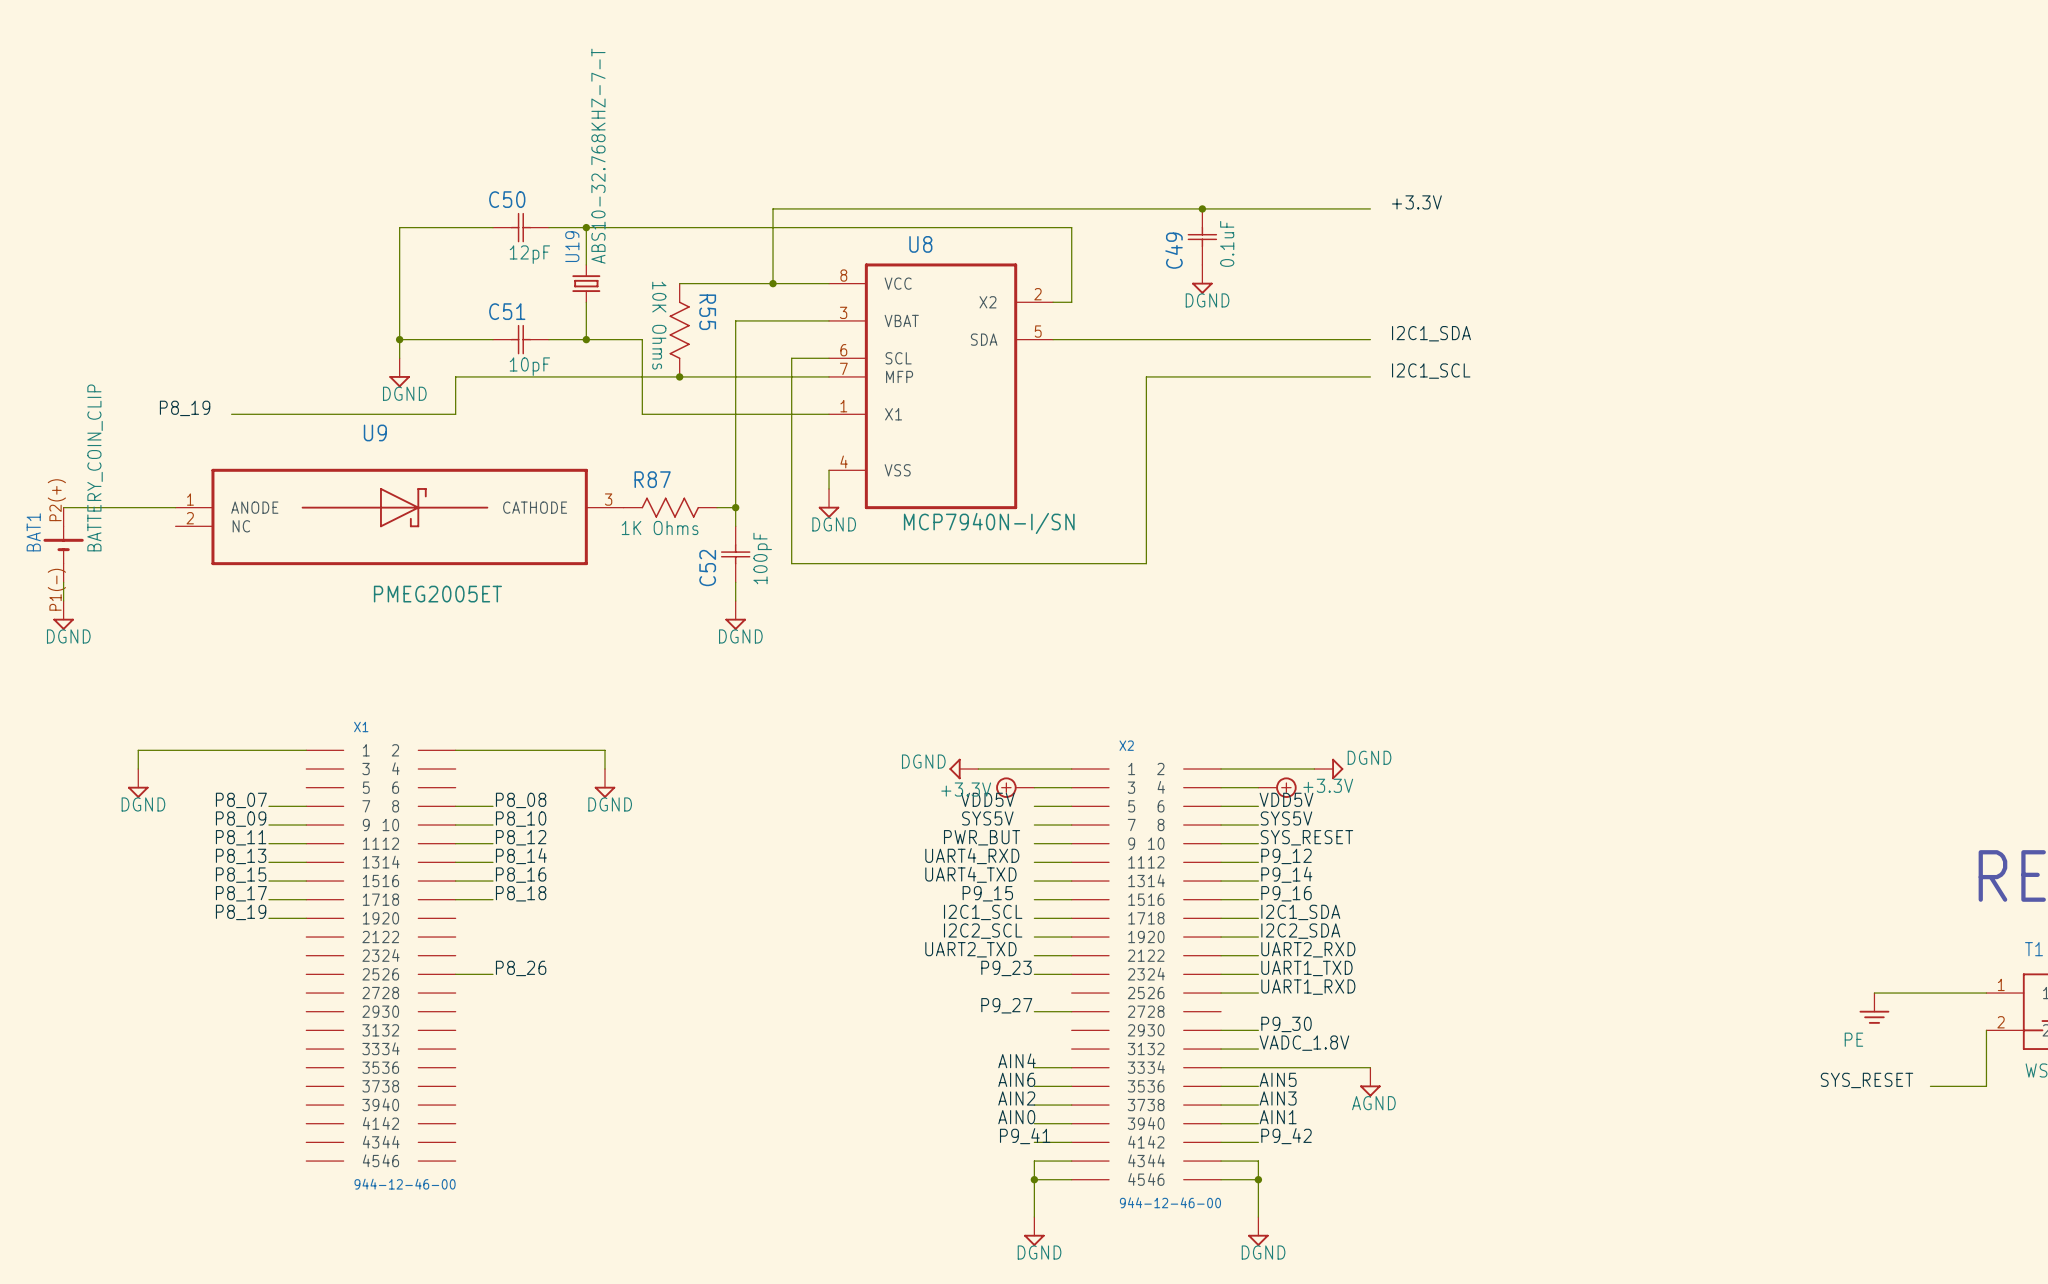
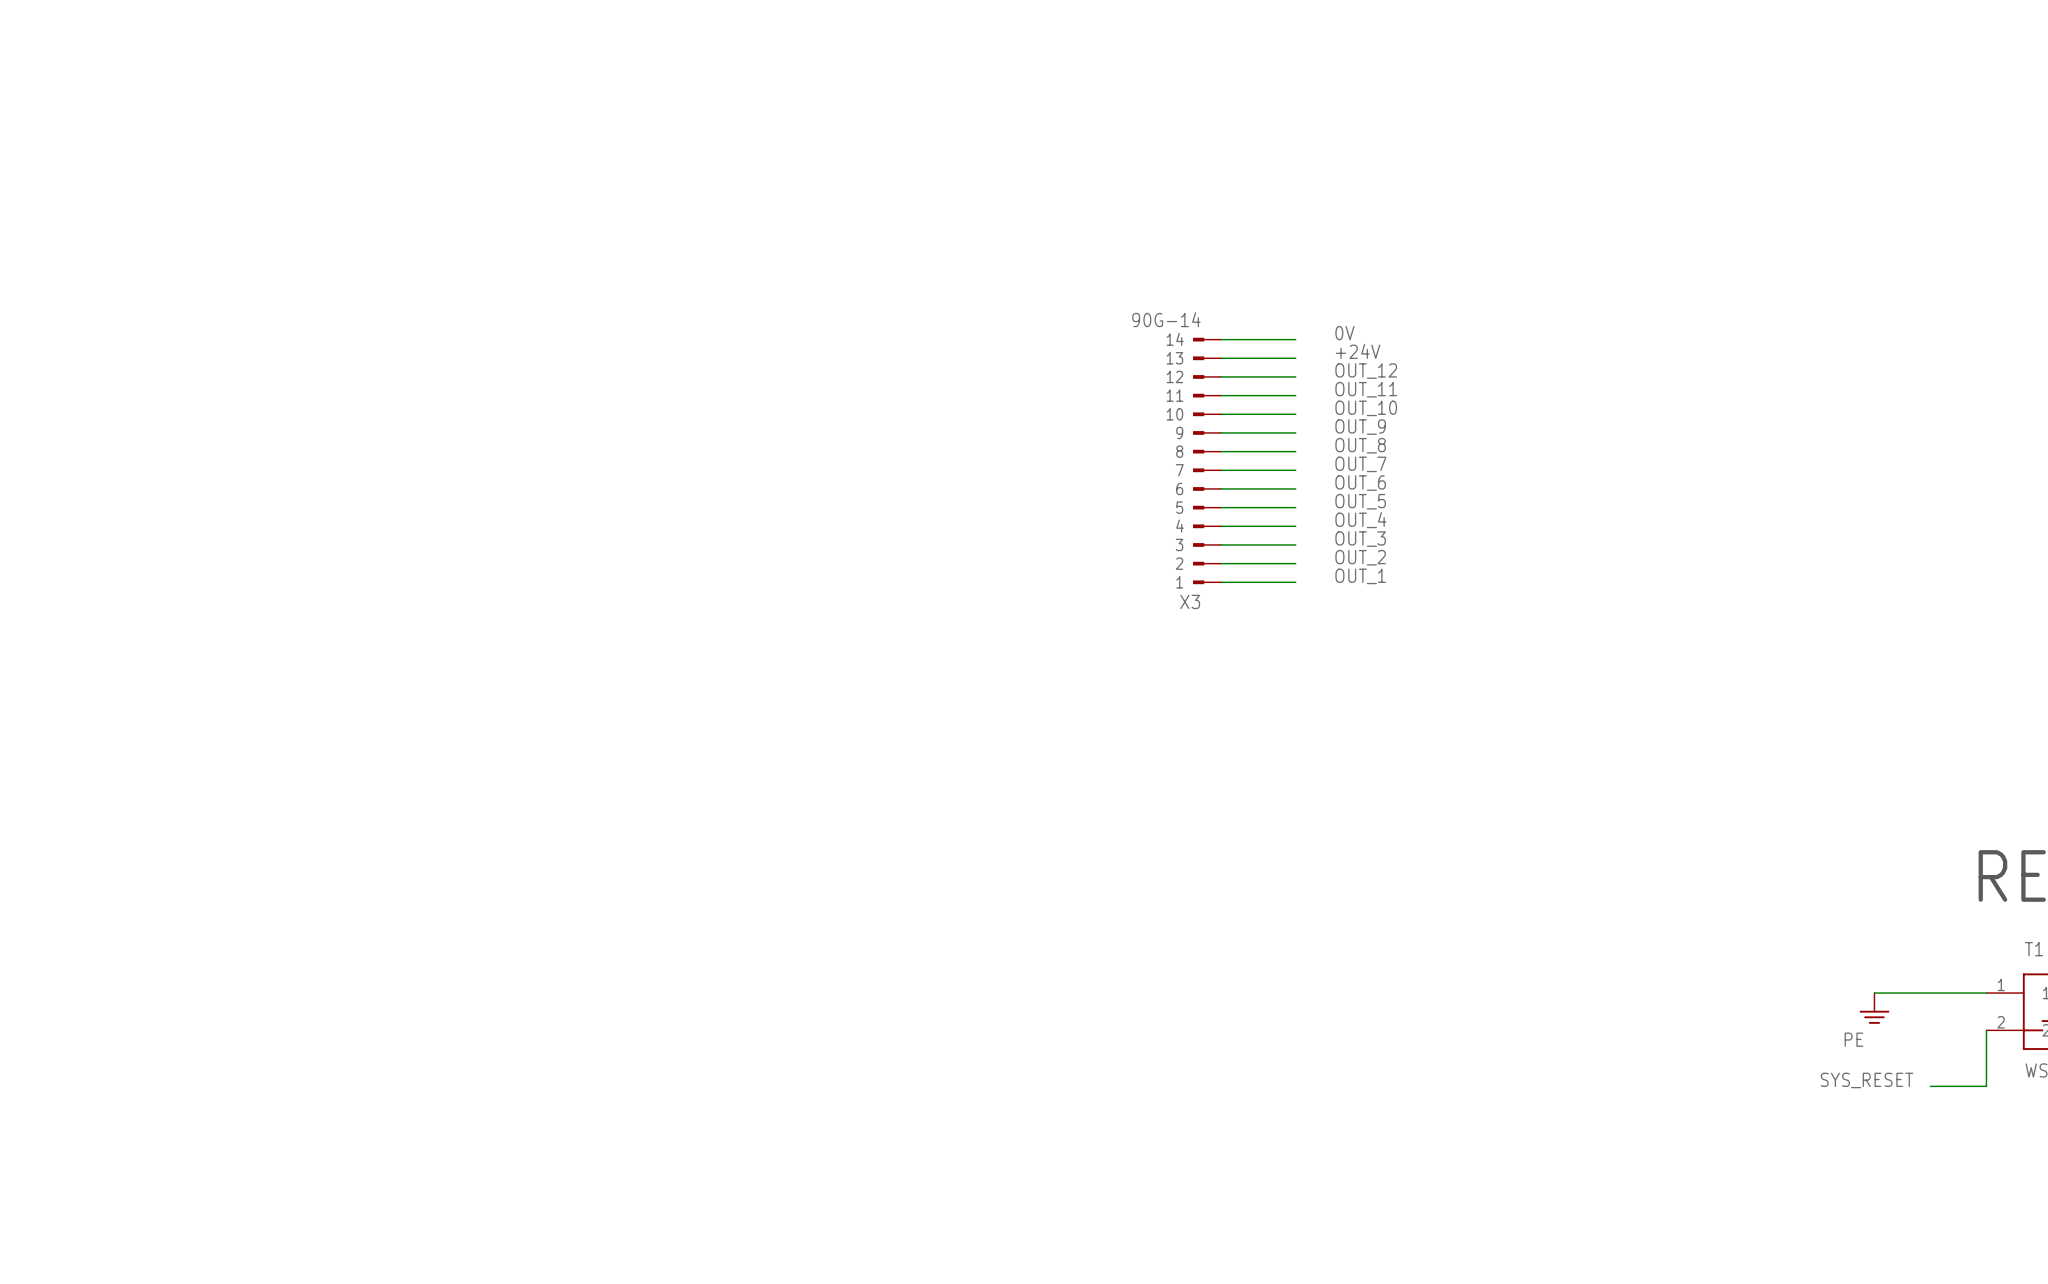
label: +3.3V (1416, 202) -> none
junction: (1202, 208) -> none
wire: (1370, 208) (773, 208) (773, 283) -> none
wire: (492, 227) (399, 227) (399, 358) -> none
C50: 12pF (520, 227) -> none
wire: (548, 227) (1071, 227) (1071, 302) (1053, 302) -> none
wire: (586, 227) (586, 264) -> none
junction: (586, 227) -> none
C49: 0.1uF (1202, 236) -> none
power symbol: DGND (1202, 279) -> none
U19: ABS10-32.768KHZ-7-T (586, 283) -> none
wire: (679, 283) (829, 283) -> none
junction: (773, 283) -> none
wire: (586, 302) (586, 339) -> none
wire: (829, 320) (735, 320) (735, 526) -> none
R55: 10K Ohms (679, 330) -> none
label: none -> 0V (1344, 333)
label: I2C1_SDA (1431, 333) -> none
wire: (399, 339) (492, 339) -> none
junction: (399, 339) -> none
C51: 10pF (520, 339) -> none
wire: (548, 339) (642, 339) (642, 414) (829, 414) -> none
junction: (586, 339) -> none
wire: (1053, 339) (1221, 339) -> none
wire: (1295, 339) (1370, 339) -> (1221, 358) (1295, 358)
label: none -> +24V (1358, 351)
wire: (829, 358) (791, 358) (791, 563) (1146, 563) (1146, 376) (1221, 376) -> none
label: none -> OUT_12 (1366, 371)
label: I2C1_SCL (1431, 371) -> none
power symbol: DGND (399, 372) -> none
junction: (679, 376) -> none
wire: (829, 376) (455, 376) (455, 414) (231, 414) -> none
wire: (1295, 376) (1370, 376) -> (1221, 395) (1295, 395)
U8: MCP7940N-I/SN (941, 386) -> none
label: none -> OUT_11 (1366, 389)
label: P8_19 (185, 408) -> none
label: none -> OUT_10 (1366, 408)
wire: none -> (1221, 414) (1295, 414)
label: none -> OUT_9 (1360, 427)
wire: none -> (1221, 432) (1295, 432)
label: none -> OUT_8 (1360, 445)
wire: none -> (1221, 451) (1295, 451)
X3: none -> 90G-14 (1207, 460)
label: none -> OUT_7 (1360, 464)
wire: (829, 470) (829, 488) -> none
wire: none -> (1221, 470) (1295, 470)
label: none -> OUT_6 (1360, 483)
wire: none -> (1221, 488) (1295, 488)
label: none -> OUT_5 (1360, 501)
power symbol: DGND (829, 503) -> none
wire: (63, 507) (175, 507) -> none
R87: 1K Ohms (670, 507) -> none
wire: (717, 507) (735, 507) -> none
junction: (735, 507) -> none
wire: none -> (1221, 507) (1295, 507)
U9: PMEG2005ET (399, 516) -> none
label: none -> OUT_4 (1360, 520)
wire: none -> (1221, 526) (1295, 526)
label: none -> OUT_3 (1360, 539)
BAT1: BATTERY_COIN_CLIP (63, 544) -> none
wire: none -> (1221, 544) (1295, 544)
C52: 100pF (735, 554) -> none
label: none -> OUT_2 (1360, 557)
wire: none -> (1221, 563) (1295, 563)
label: none -> OUT_1 (1360, 576)
wire: (63, 582) (63, 600) -> none
wire: (735, 582) (735, 600) -> none
wire: none -> (1221, 582) (1295, 582)
power symbol: DGND (63, 615) -> none
power symbol: DGND (735, 615) -> none
wire: (306, 750) (138, 750) (138, 769) -> none
wire: (455, 750) (604, 750) (604, 769) -> none
power symbol: DGND (963, 769) -> none
wire: (978, 769) (1071, 769) -> none
wire: (1221, 769) (1314, 769) -> none
power symbol: DGND (1328, 769) -> none
power symbol: DGND (138, 783) -> none
power symbol: DGND (604, 783) -> none
power symbol: +3.3V (1015, 787) -> none
wire: (1034, 787) (1071, 787) -> none
wire: (1221, 787) (1258, 787) -> none
power symbol: +3.3V (1277, 787) -> none
label: VDD5V (987, 799) -> none
label: VDD5V (1286, 799) -> none
label: P8_07 (241, 800) -> none
label: P8_08 (521, 800) -> none
wire: (268, 806) (306, 806) -> none
wire: (455, 806) (492, 806) -> none
wire: (1034, 806) (1071, 806) -> none
wire: (1221, 806) (1258, 806) -> none
label: SYS5V (987, 818) -> none
label: SYS5V (1286, 818) -> none
label: P8_09 (241, 819) -> none
label: P8_10 (521, 819) -> none
wire: (268, 825) (306, 825) -> none
wire: (455, 825) (492, 825) -> none
wire: (1034, 825) (1071, 825) -> none
wire: (1221, 825) (1258, 825) -> none
label: P8_11 (241, 837) -> none
label: P8_12 (521, 837) -> none
label: PWR_BUT (982, 837) -> none
label: SYS_RESET (1306, 837) -> none
wire: (268, 843) (306, 843) -> none
wire: (455, 843) (492, 843) -> none
wire: (1034, 843) (1071, 843) -> none
wire: (1221, 843) (1258, 843) -> none
label: P8_13 (241, 856) -> none
label: P8_14 (521, 856) -> none
label: UART4_RXD (972, 856) -> none
label: P9_12 (1286, 856) -> none
wire: (268, 862) (306, 862) -> none
wire: (455, 862) (492, 862) -> none
wire: (1034, 862) (1071, 862) -> none
wire: (1221, 862) (1258, 862) -> none
label: UART4_TXD (970, 874) -> none
label: P9_14 (1286, 874) -> none
label: P8_15 (241, 875) -> none
label: P8_16 (521, 875) -> none
wire: (268, 881) (306, 881) -> none
wire: (455, 881) (492, 881) -> none
wire: (1034, 881) (1071, 881) -> none
wire: (1221, 881) (1258, 881) -> none
label: P8_17 (241, 893) -> none
label: P8_18 (521, 893) -> none
label: P9_15 (987, 893) -> none
label: P9_16 (1286, 893) -> none
wire: (268, 899) (306, 899) -> none
wire: (455, 899) (492, 899) -> none
wire: (1034, 899) (1071, 899) -> none
wire: (1221, 899) (1258, 899) -> none
label: P8_19 (241, 912) -> none
label: I2C1_SCL (983, 912) -> none
label: I2C1_SDA (1300, 912) -> none
wire: (268, 918) (306, 918) -> none
wire: (1034, 918) (1071, 918) -> none
wire: (1221, 918) (1258, 918) -> none
label: I2C2_SCL (983, 931) -> none
label: I2C2_SDA (1300, 931) -> none
wire: (1034, 937) (1071, 937) -> none
wire: (1221, 937) (1258, 937) -> none
label: UART2_TXD (970, 949) -> none
label: UART2_RXD (1308, 949) -> none
X1: 944-12-46-00 (380, 955) -> none
wire: (1034, 955) (1071, 955) -> none
wire: (1221, 955) (1258, 955) -> none
label: P8_26 (521, 968) -> none
label: P9_23 (1006, 968) -> none
label: UART1_TXD (1306, 968) -> none
wire: (455, 974) (492, 974) -> none
wire: (1034, 974) (1071, 974) -> none
X2: 944-12-46-00 (1146, 974) -> none
wire: (1221, 974) (1258, 974) -> none
label: UART1_RXD (1308, 987) -> none
wire: (1221, 993) (1258, 993) -> none
label: P9_27 (1006, 1005) -> none
wire: (1034, 1011) (1071, 1011) -> none
label: P9_30 (1286, 1024) -> none
wire: (1221, 1030) (1258, 1030) -> none
label: VADC_1.8V (1304, 1043) -> none
wire: (1221, 1049) (1258, 1049) -> none
label: AIN4 (1017, 1060) -> none
wire: (1034, 1067) (1071, 1067) -> none
wire: (1221, 1067) (1370, 1067) -> none
label: AIN6 (1016, 1079) -> none
label: AIN5 (1278, 1079) -> none
power symbol: AGND (1370, 1082) -> none
wire: (1034, 1086) (1071, 1086) -> none
wire: (1221, 1086) (1258, 1086) -> none
label: AIN2 (1016, 1098) -> none
label: AIN3 (1278, 1098) -> none
wire: (1034, 1105) (1071, 1105) -> none
wire: (1221, 1105) (1258, 1105) -> none
label: AIN0 (1016, 1117) -> none
label: AIN1 (1278, 1117) -> none
wire: (1034, 1123) (1071, 1123) -> none
wire: (1221, 1123) (1258, 1123) -> none
label: P9_41 (1025, 1136) -> none
label: P9_42 (1286, 1136) -> none
wire: (1034, 1142) (1071, 1142) -> none
wire: (1221, 1142) (1258, 1142) -> none
wire: (1071, 1161) (1034, 1161) (1034, 1217) -> none
wire: (1221, 1161) (1258, 1161) (1258, 1217) -> none
wire: (1034, 1179) (1071, 1179) -> none
junction: (1034, 1179) -> none
wire: (1221, 1179) (1258, 1179) -> none
junction: (1258, 1179) -> none
power symbol: DGND (1034, 1231) -> none
power symbol: DGND (1258, 1231) -> none

